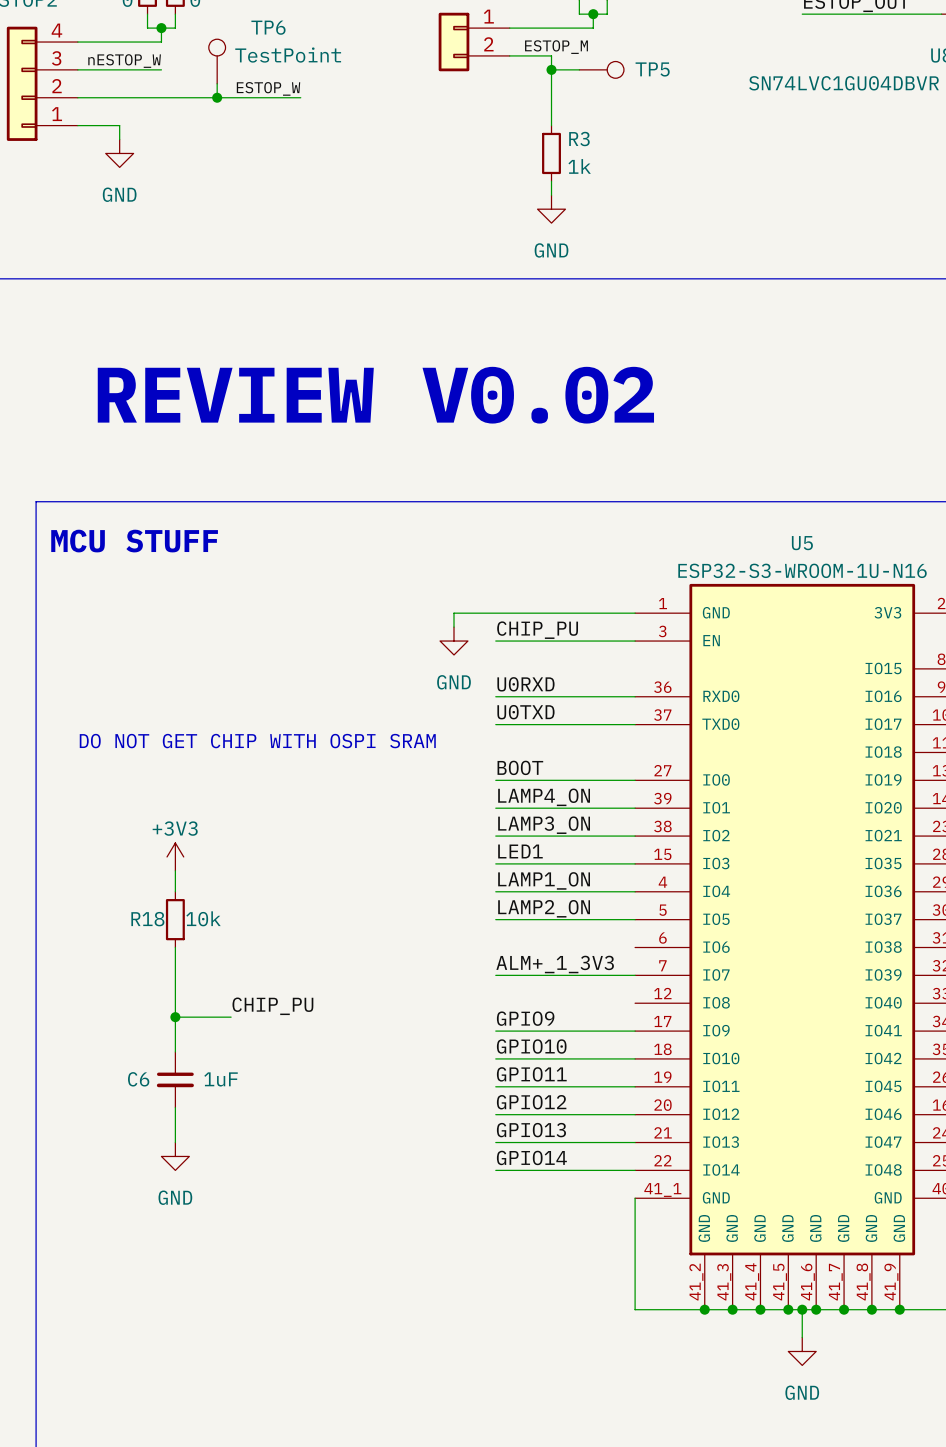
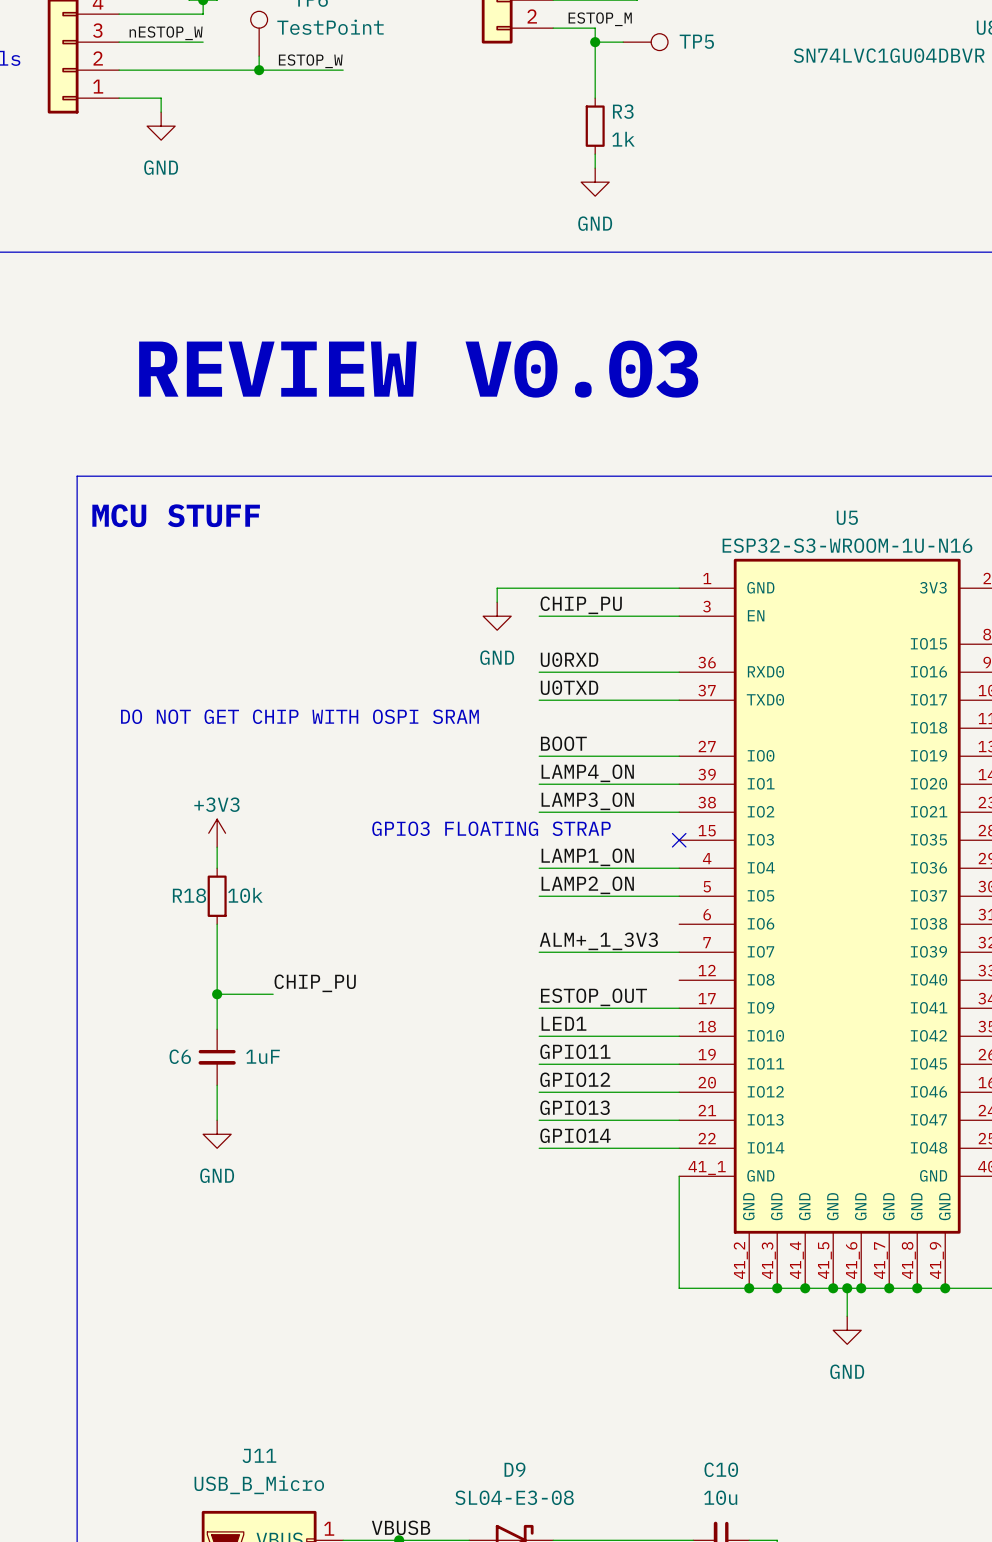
text: REVIEW V0.02 (375, 395) -> REVIEW V0.03 (418, 369)
label: LED1 (520, 851) -> none
text: none -> GPIO3 FLOATING STRAP (491, 828)
wire: (495, 863) (635, 863) -> none
no-connect mark: none -> (679, 840)
label: GPIO9 (525, 1018) -> ESTOP_OUT (594, 997)
label: GPIO10 (531, 1046) -> LED1 (563, 1023)

